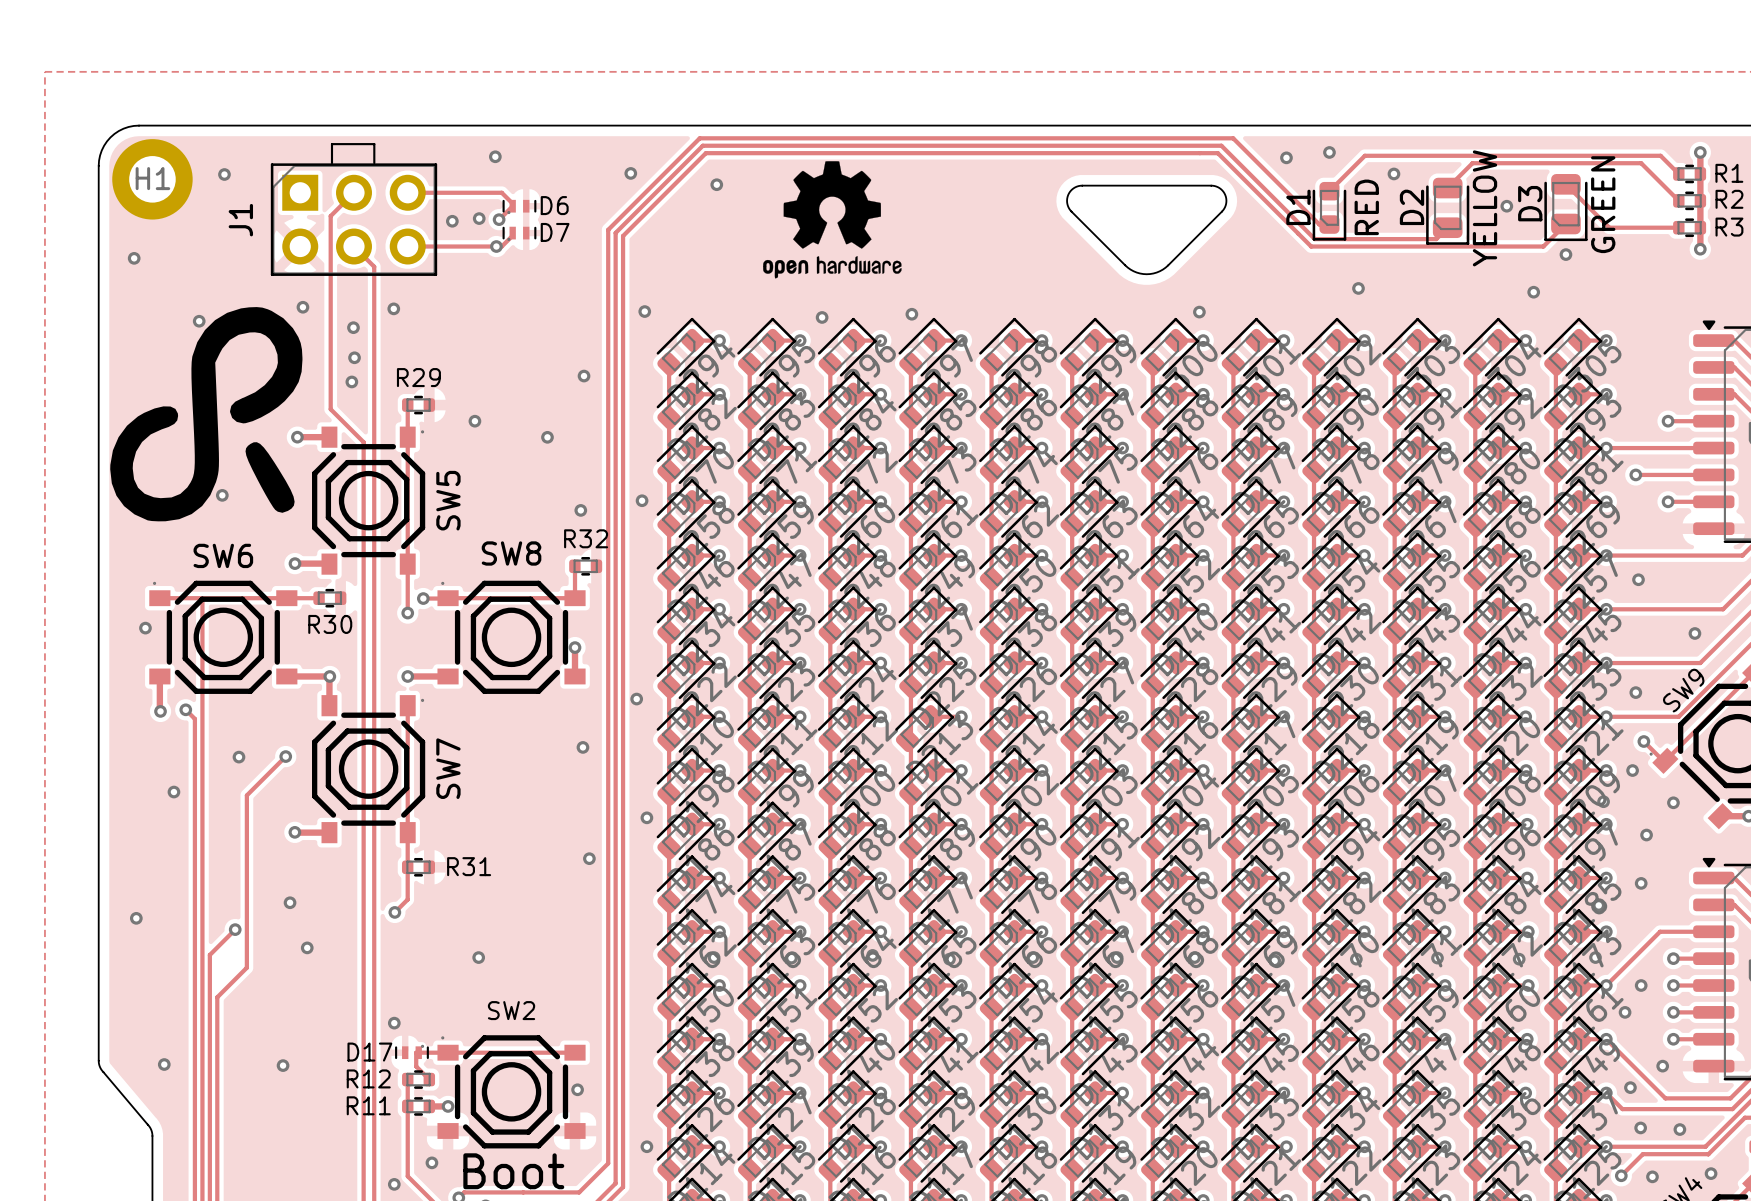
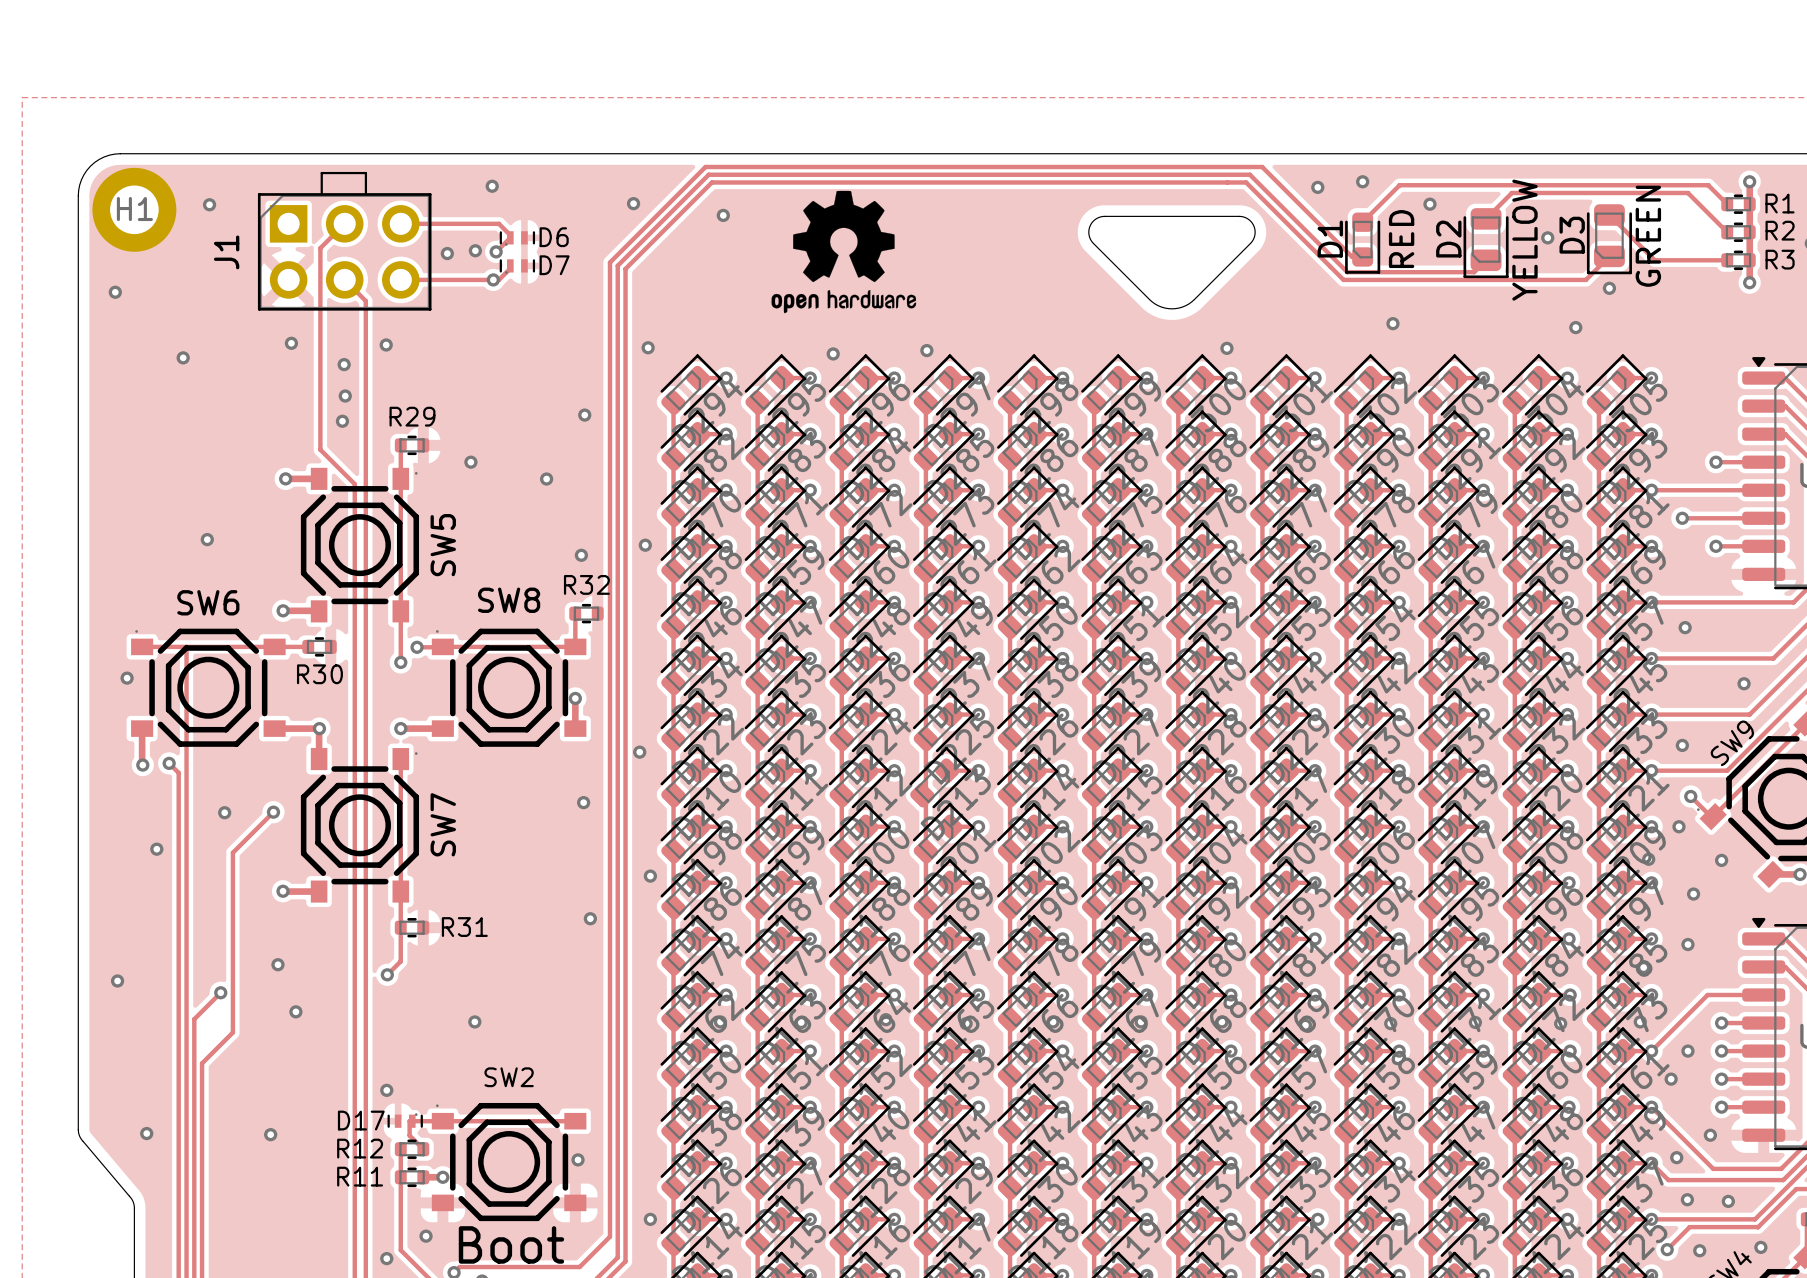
drawing: [110, 307, 303, 522] -> none

